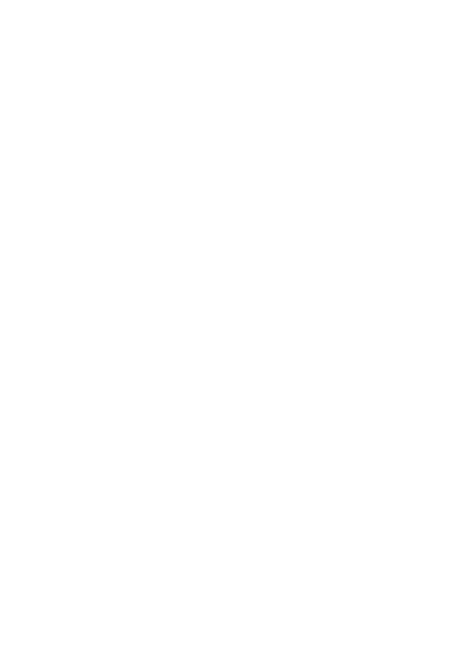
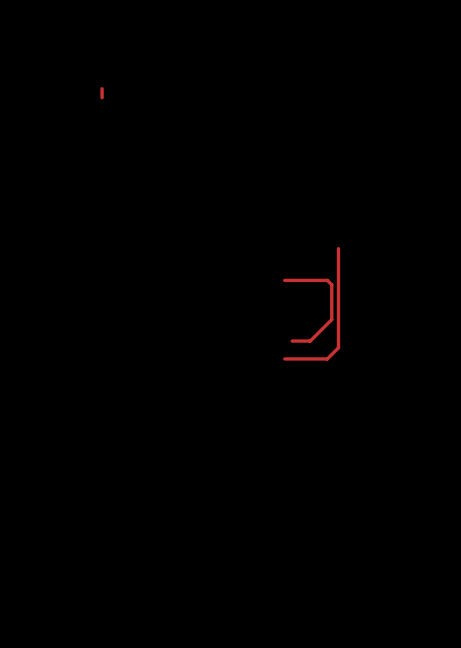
top track: none -> (102, 88) (102, 97)
top track: none -> (338, 248) (338, 347) (327, 358) (284, 358)
top track: none -> (284, 280) (327, 280) (331, 284) (331, 319) (310, 341) (292, 341)

